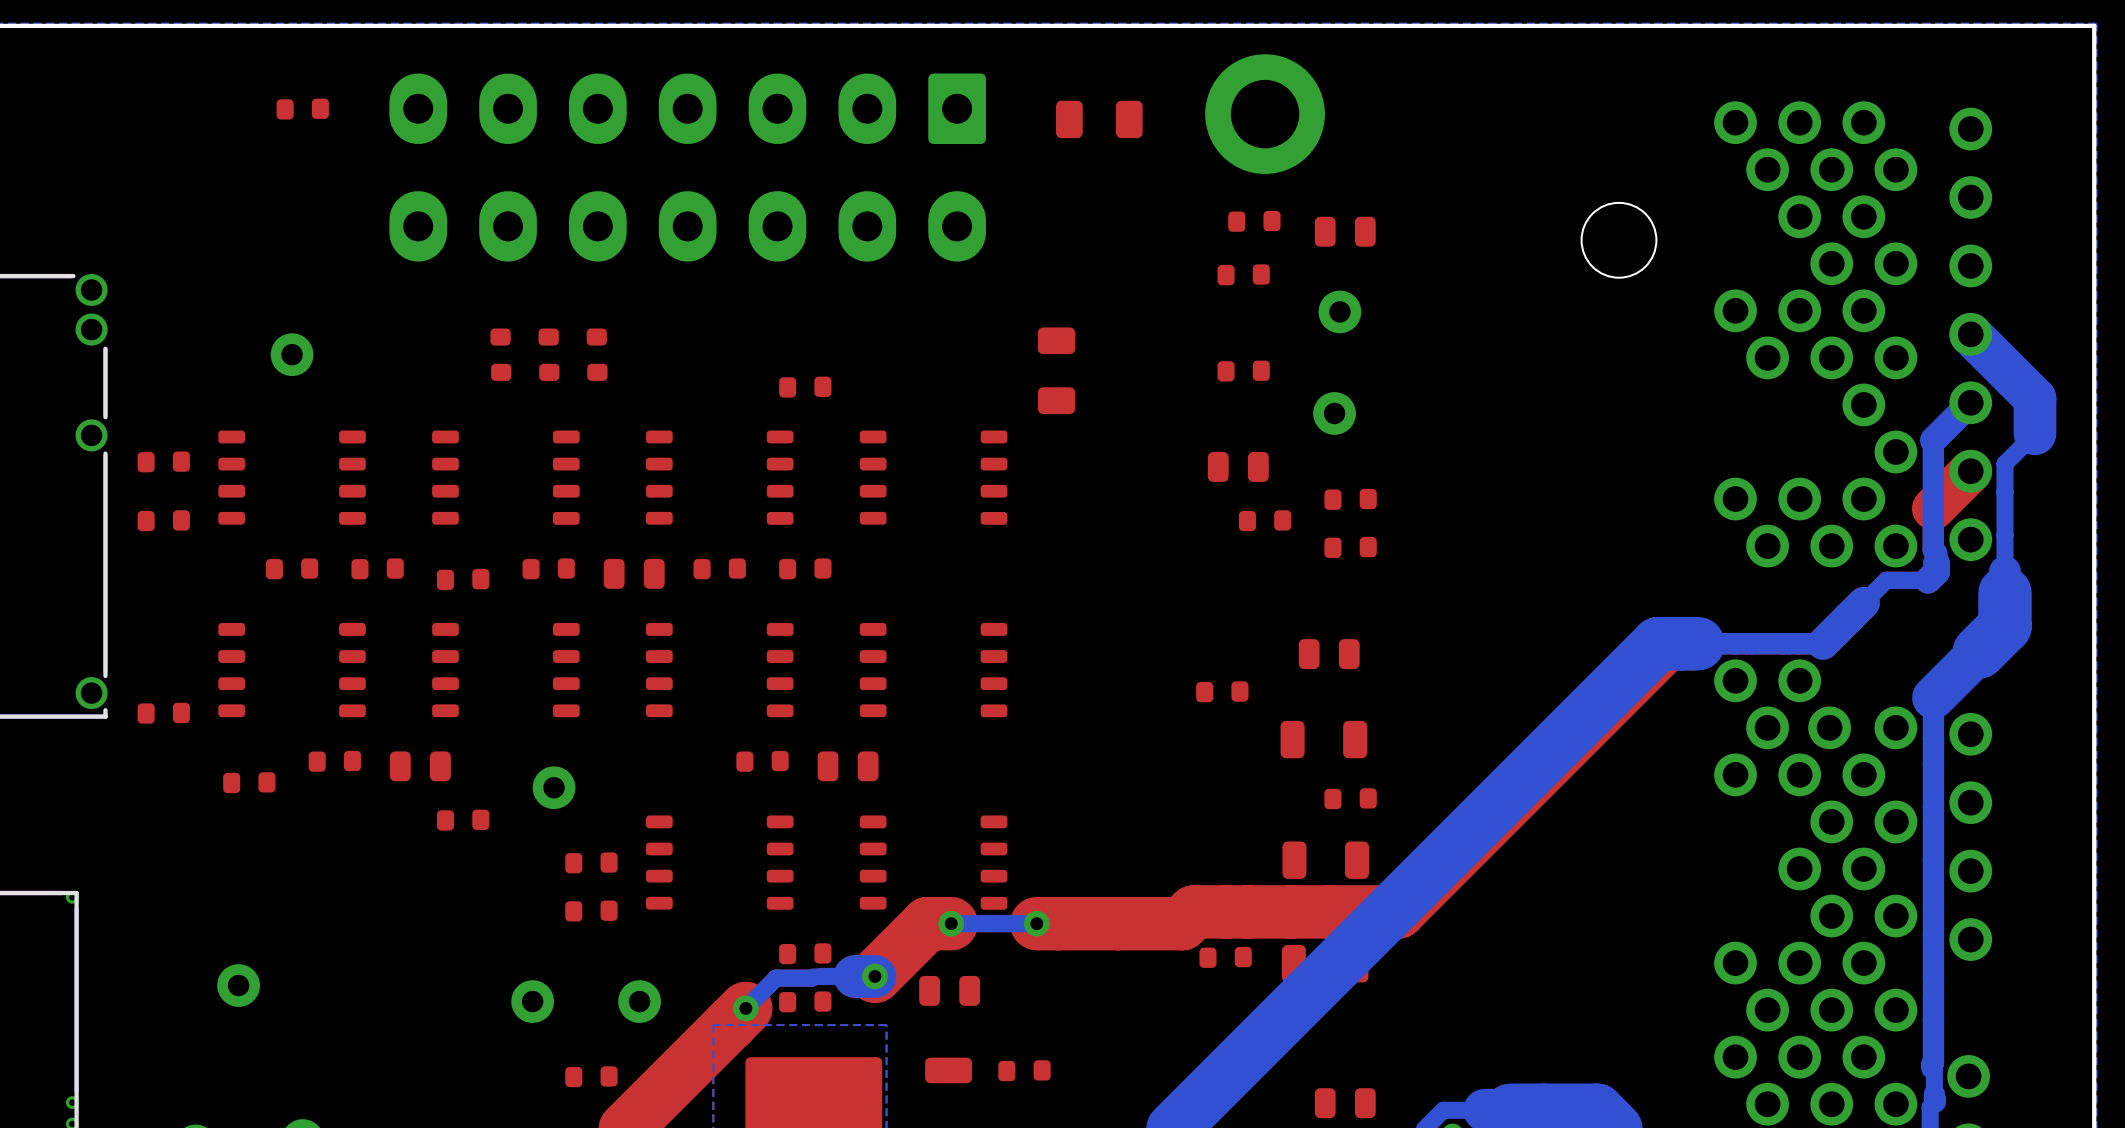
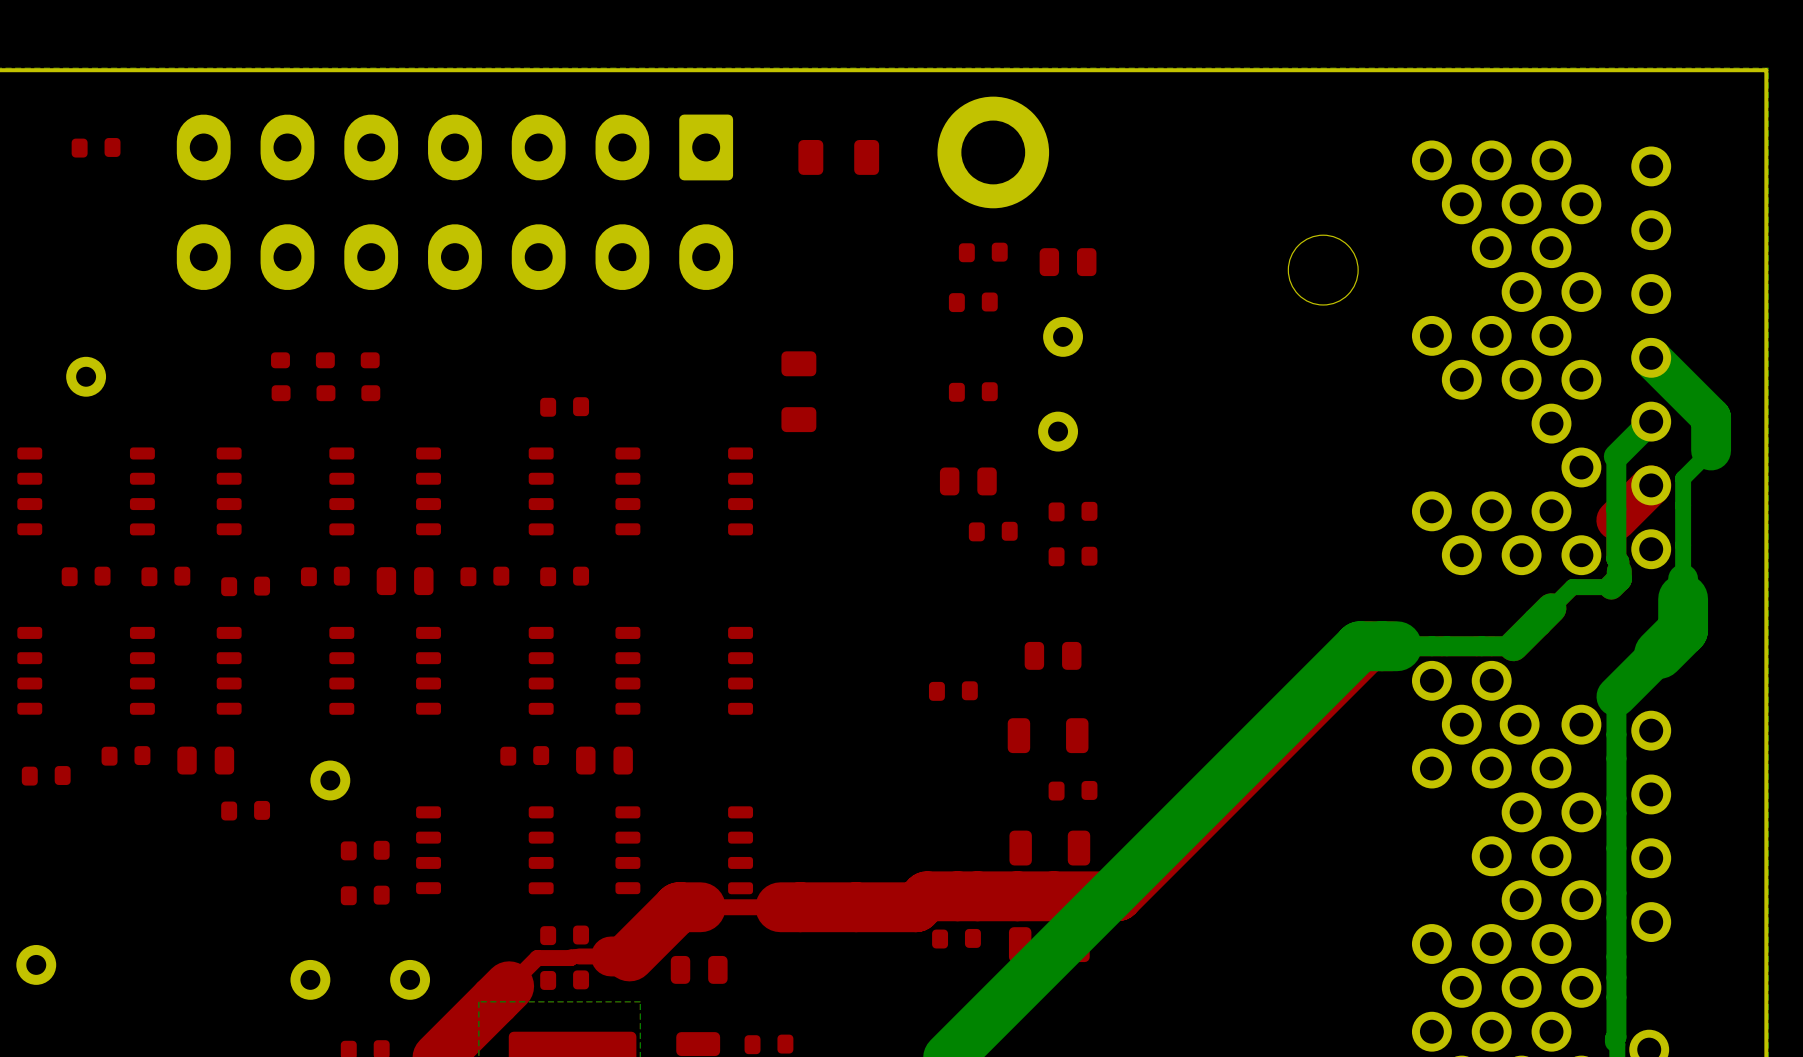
via: (951, 923) -> none
bottom track: (1036, 923) (951, 923) -> none
via: (1036, 923) -> none
bottom track: (874, 976) (820, 976) (816, 973) (811, 978) (776, 978) (745, 1008) -> none
via: (874, 976) -> none
via: (745, 1008) -> none

